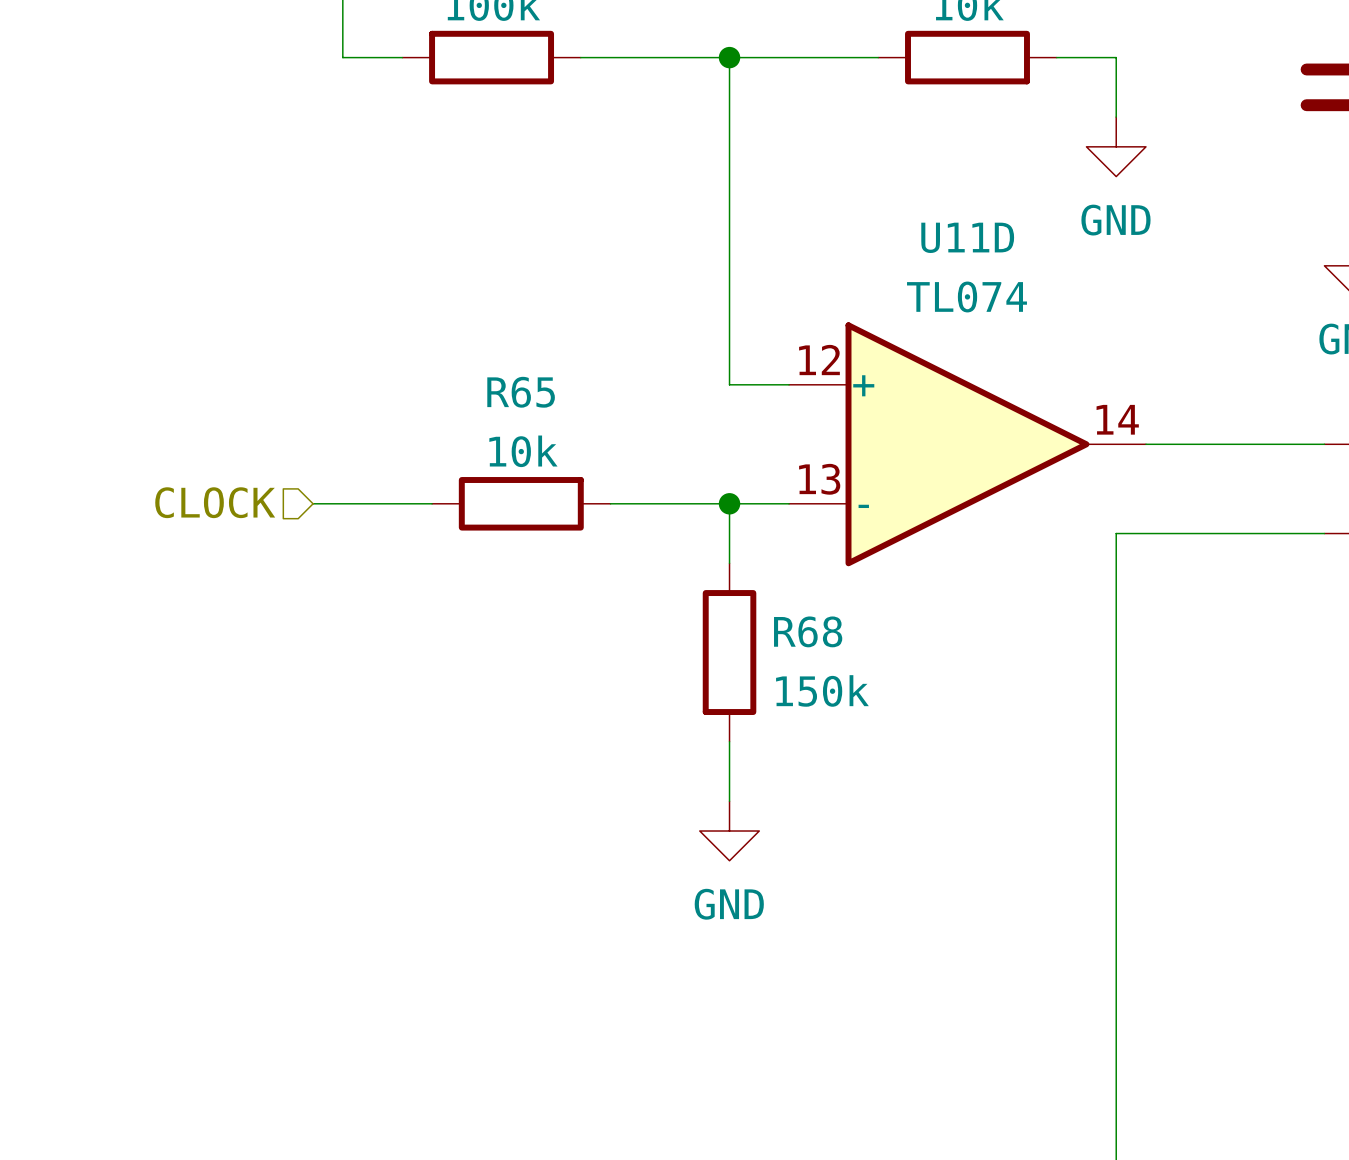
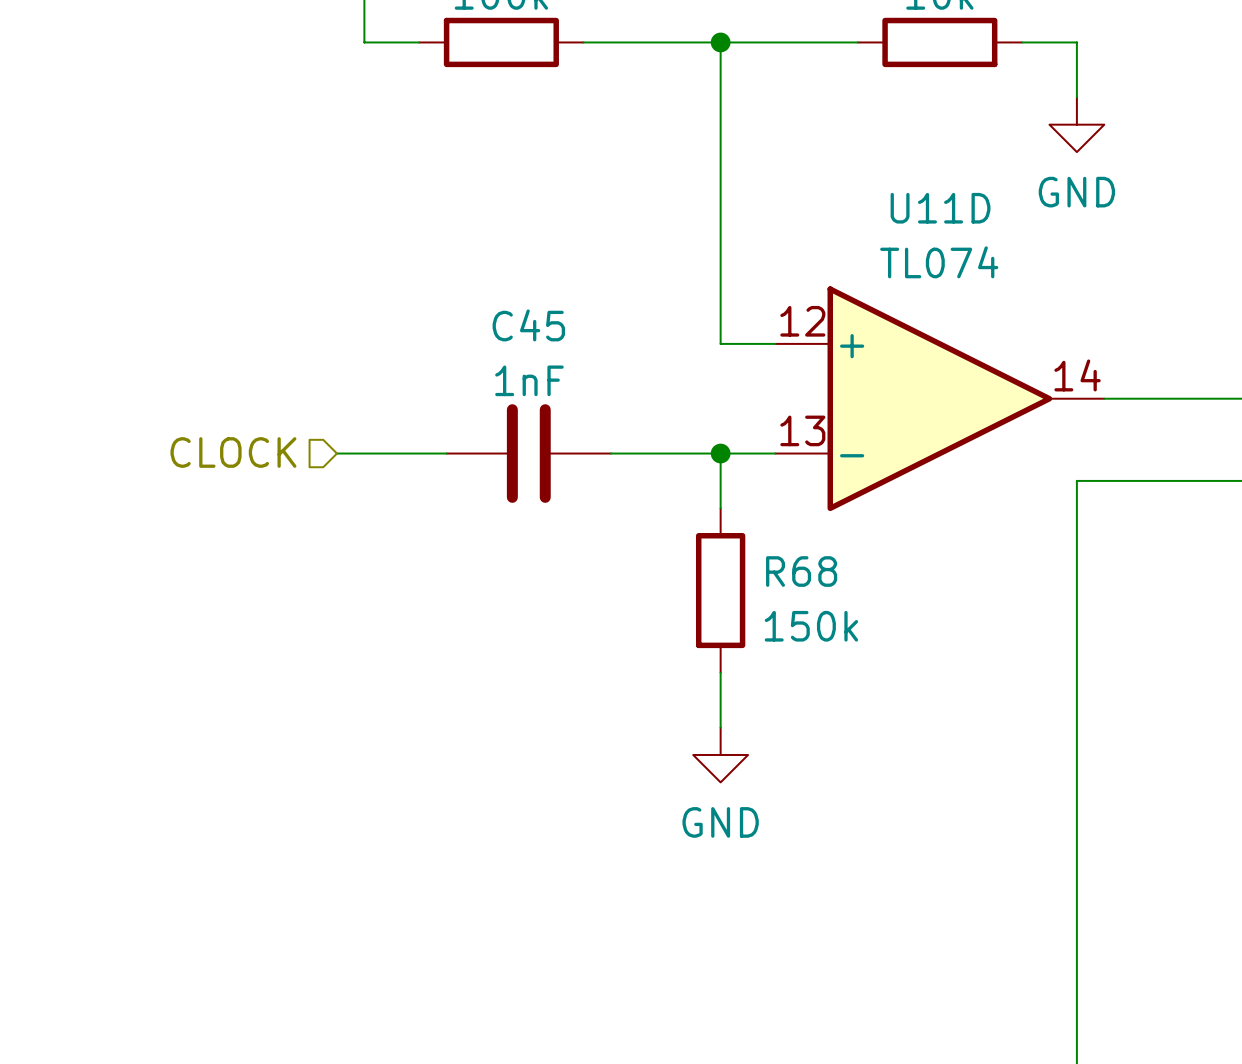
R65: 10k (521, 503) -> none
C45: none -> 1nF (528, 453)

